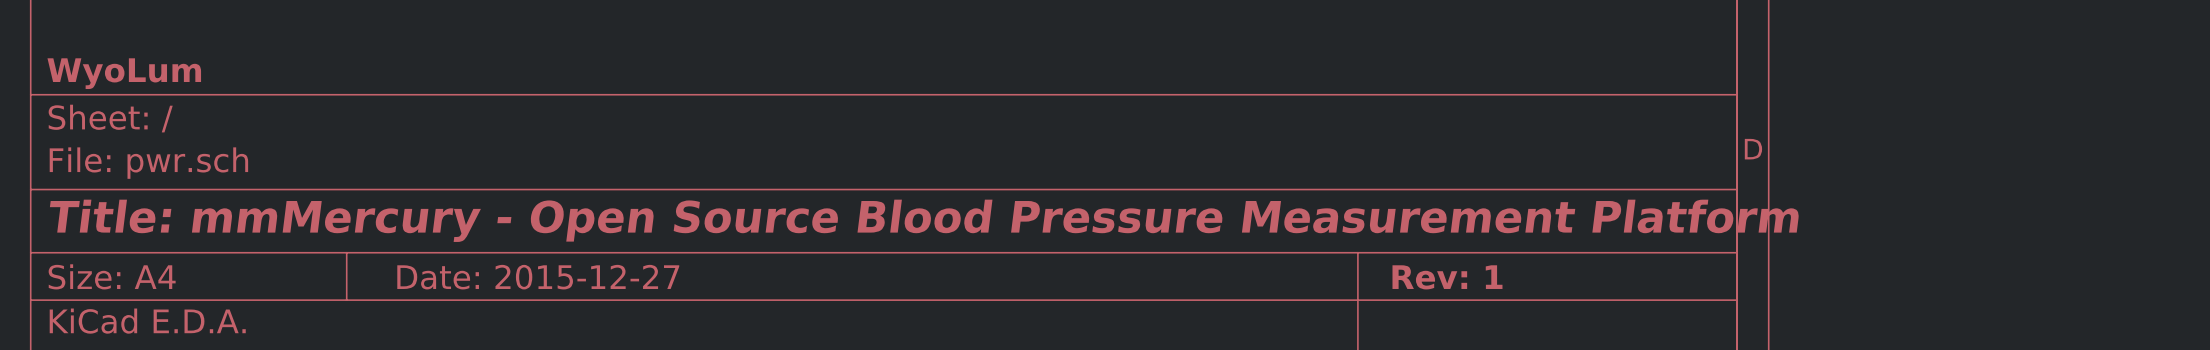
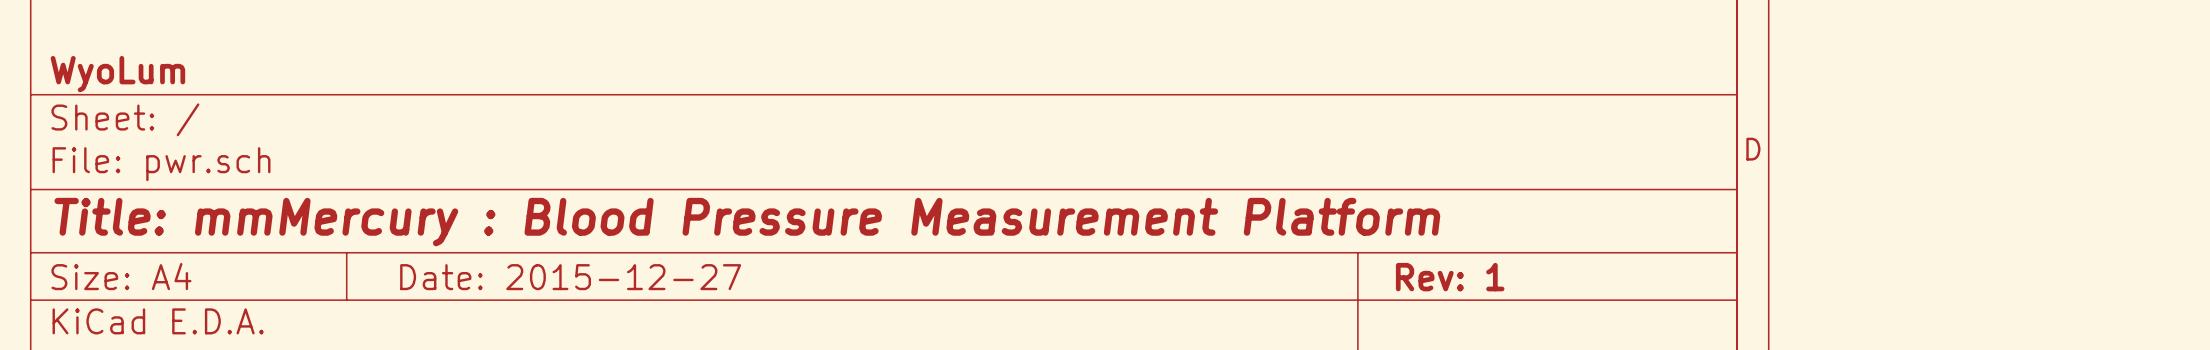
title block: Title: mmMercury - Open Source Blood Pressure Measurement Platform (924, 220) -> Title: mmMercury : Blood Pressure Measurement Platform (747, 222)

